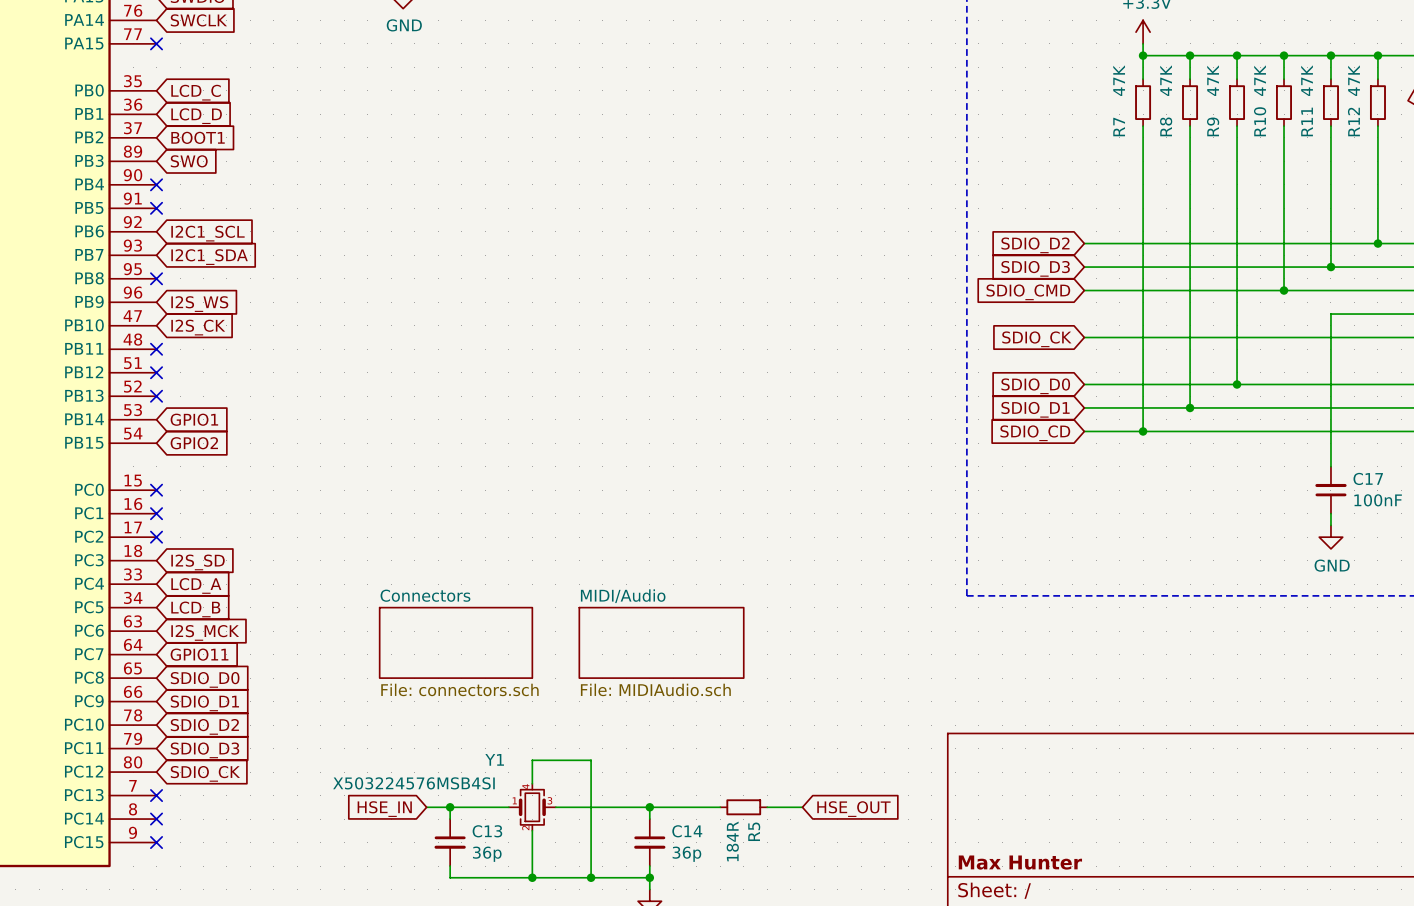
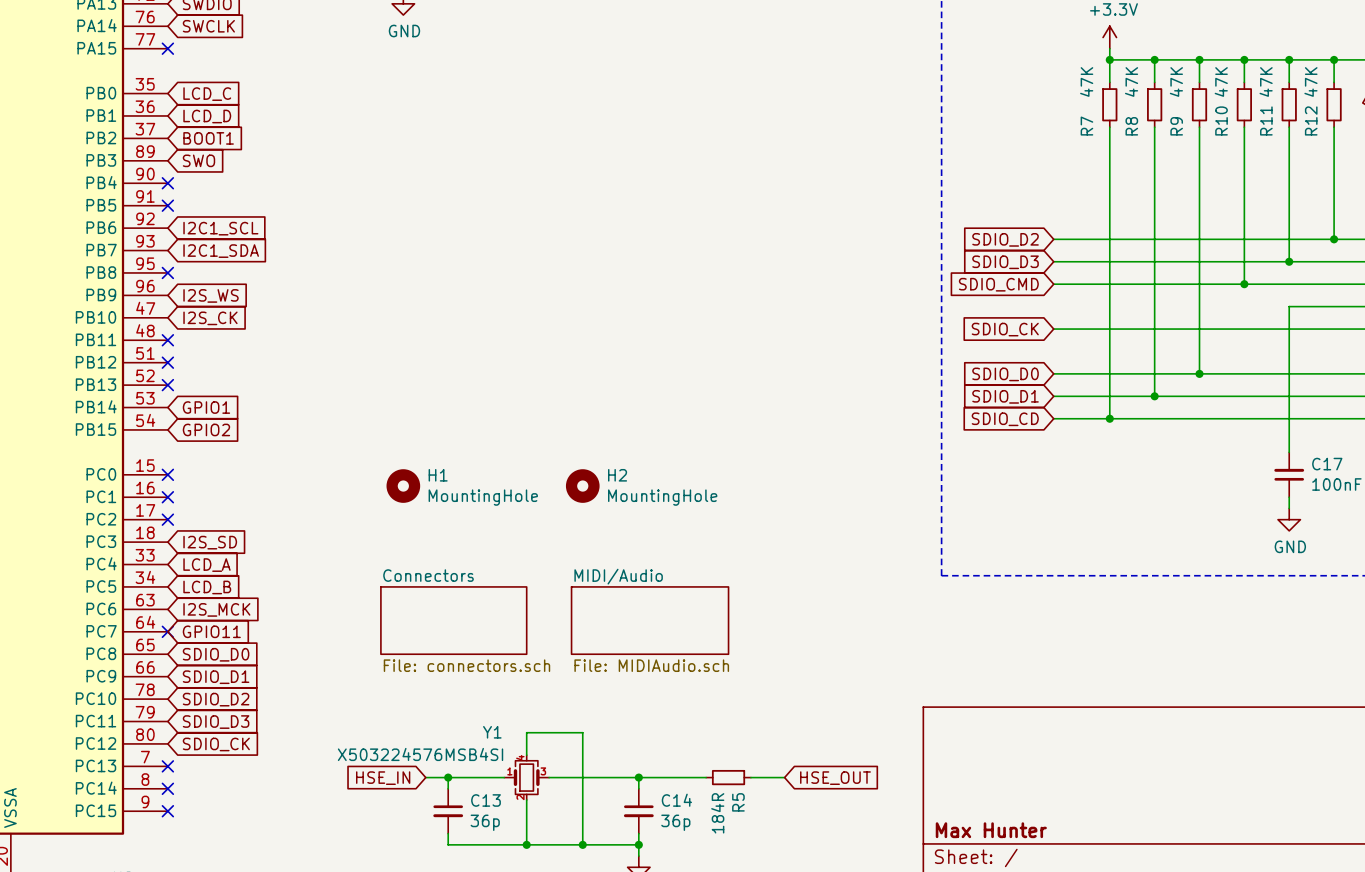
H1: none -> MountingHole (403, 486)
H2: none -> MountingHole (582, 486)
no-connect mark: none -> (167, 631)

